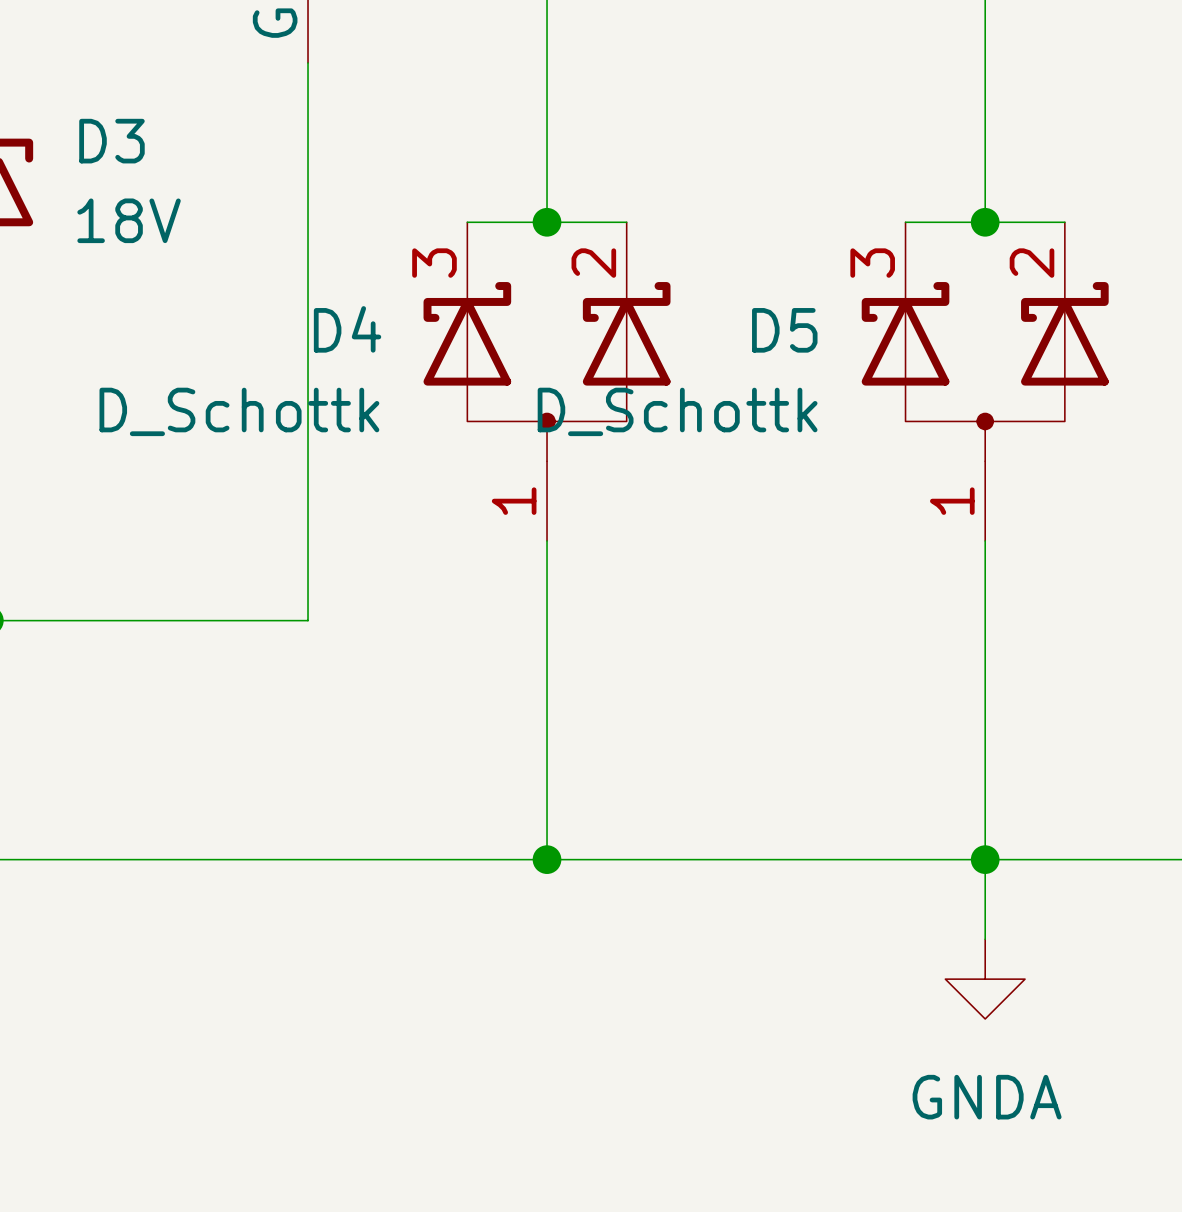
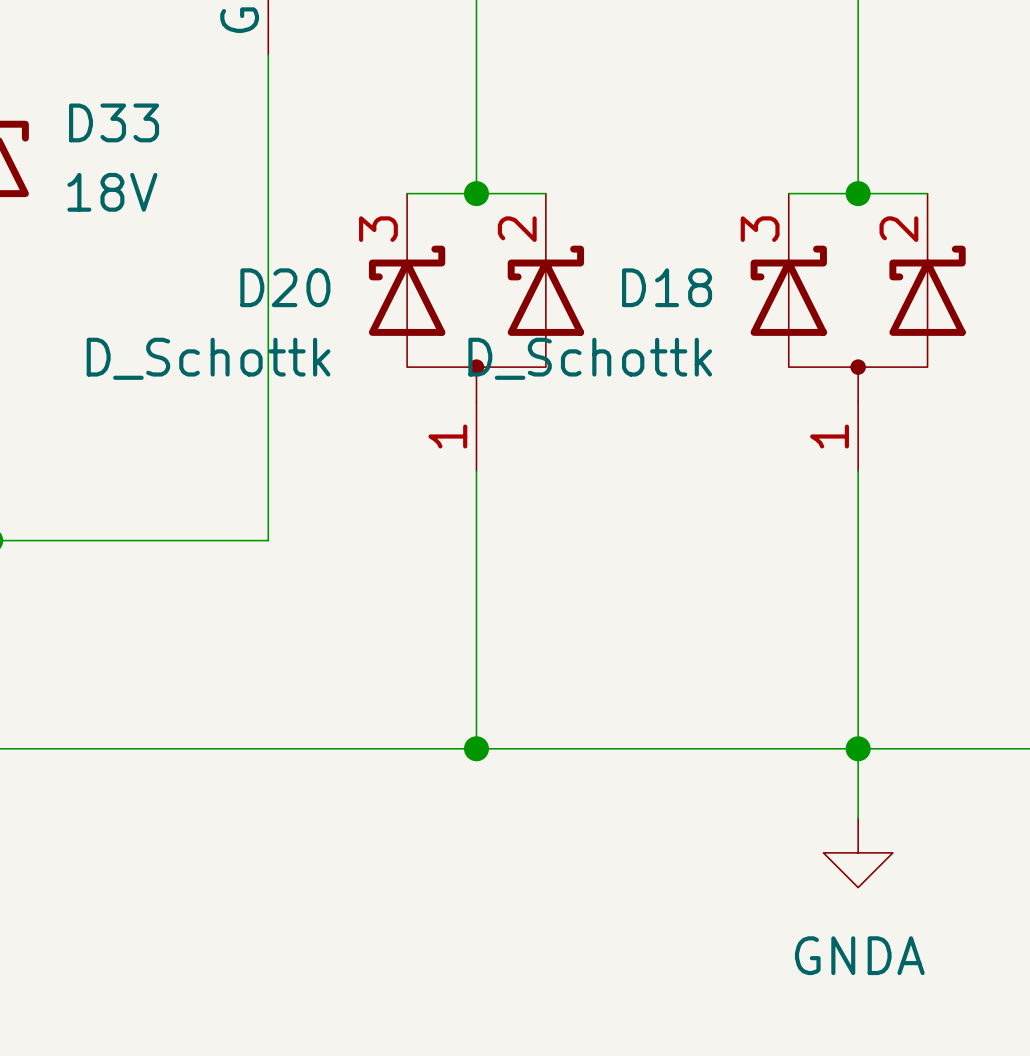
D3 name: D3 (111, 141) -> D33 (114, 122)
D4 name: D4 (347, 329) -> D20 (285, 287)
D5 name: D5 (784, 330) -> D18 (667, 287)

